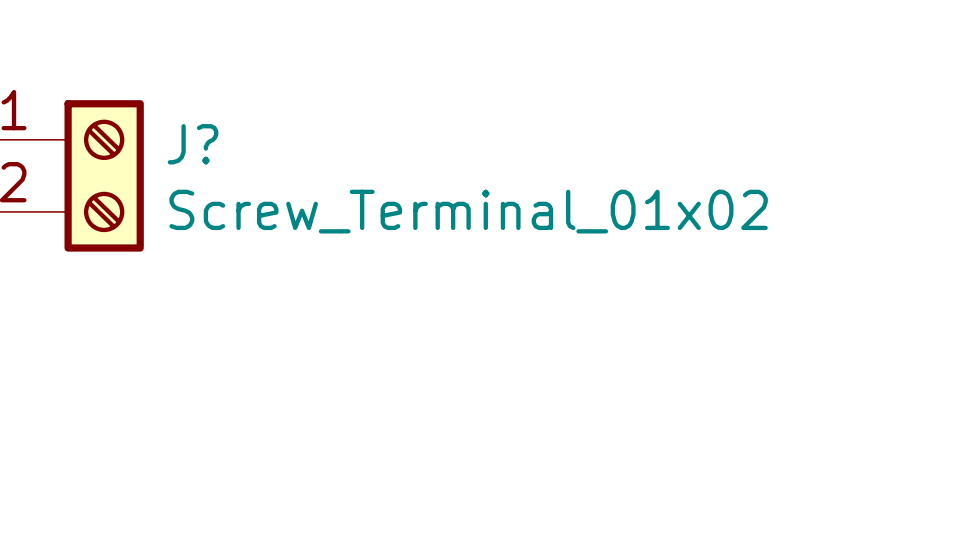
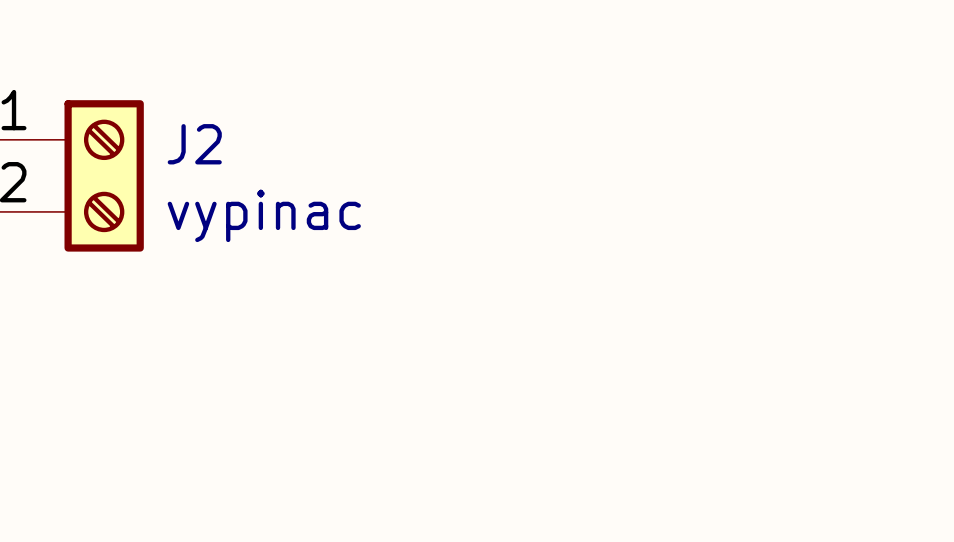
J? name: J? (193, 144) -> J2 (194, 144)
J? value: Screw_Terminal_01x02 (468, 211) -> vypinac (264, 215)

